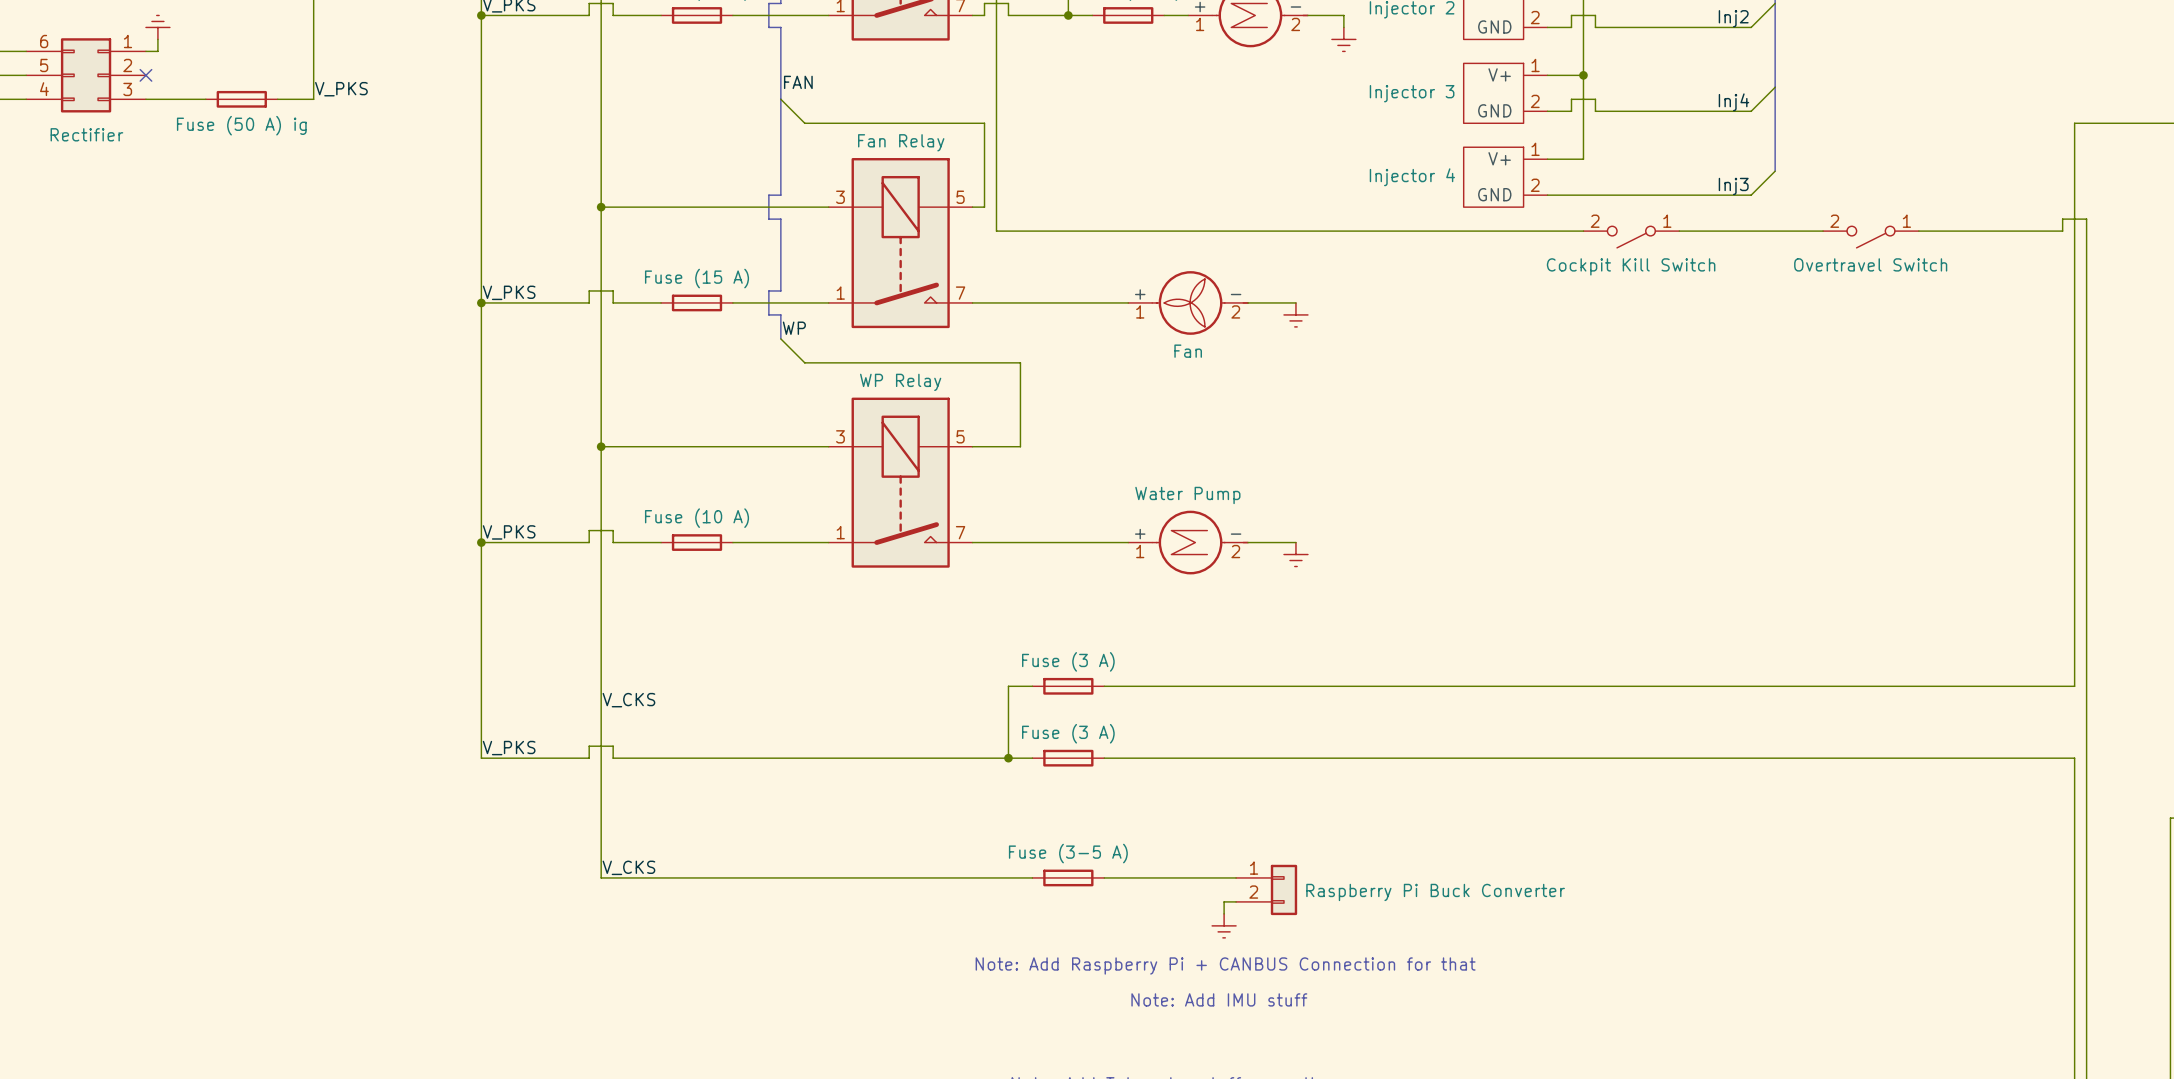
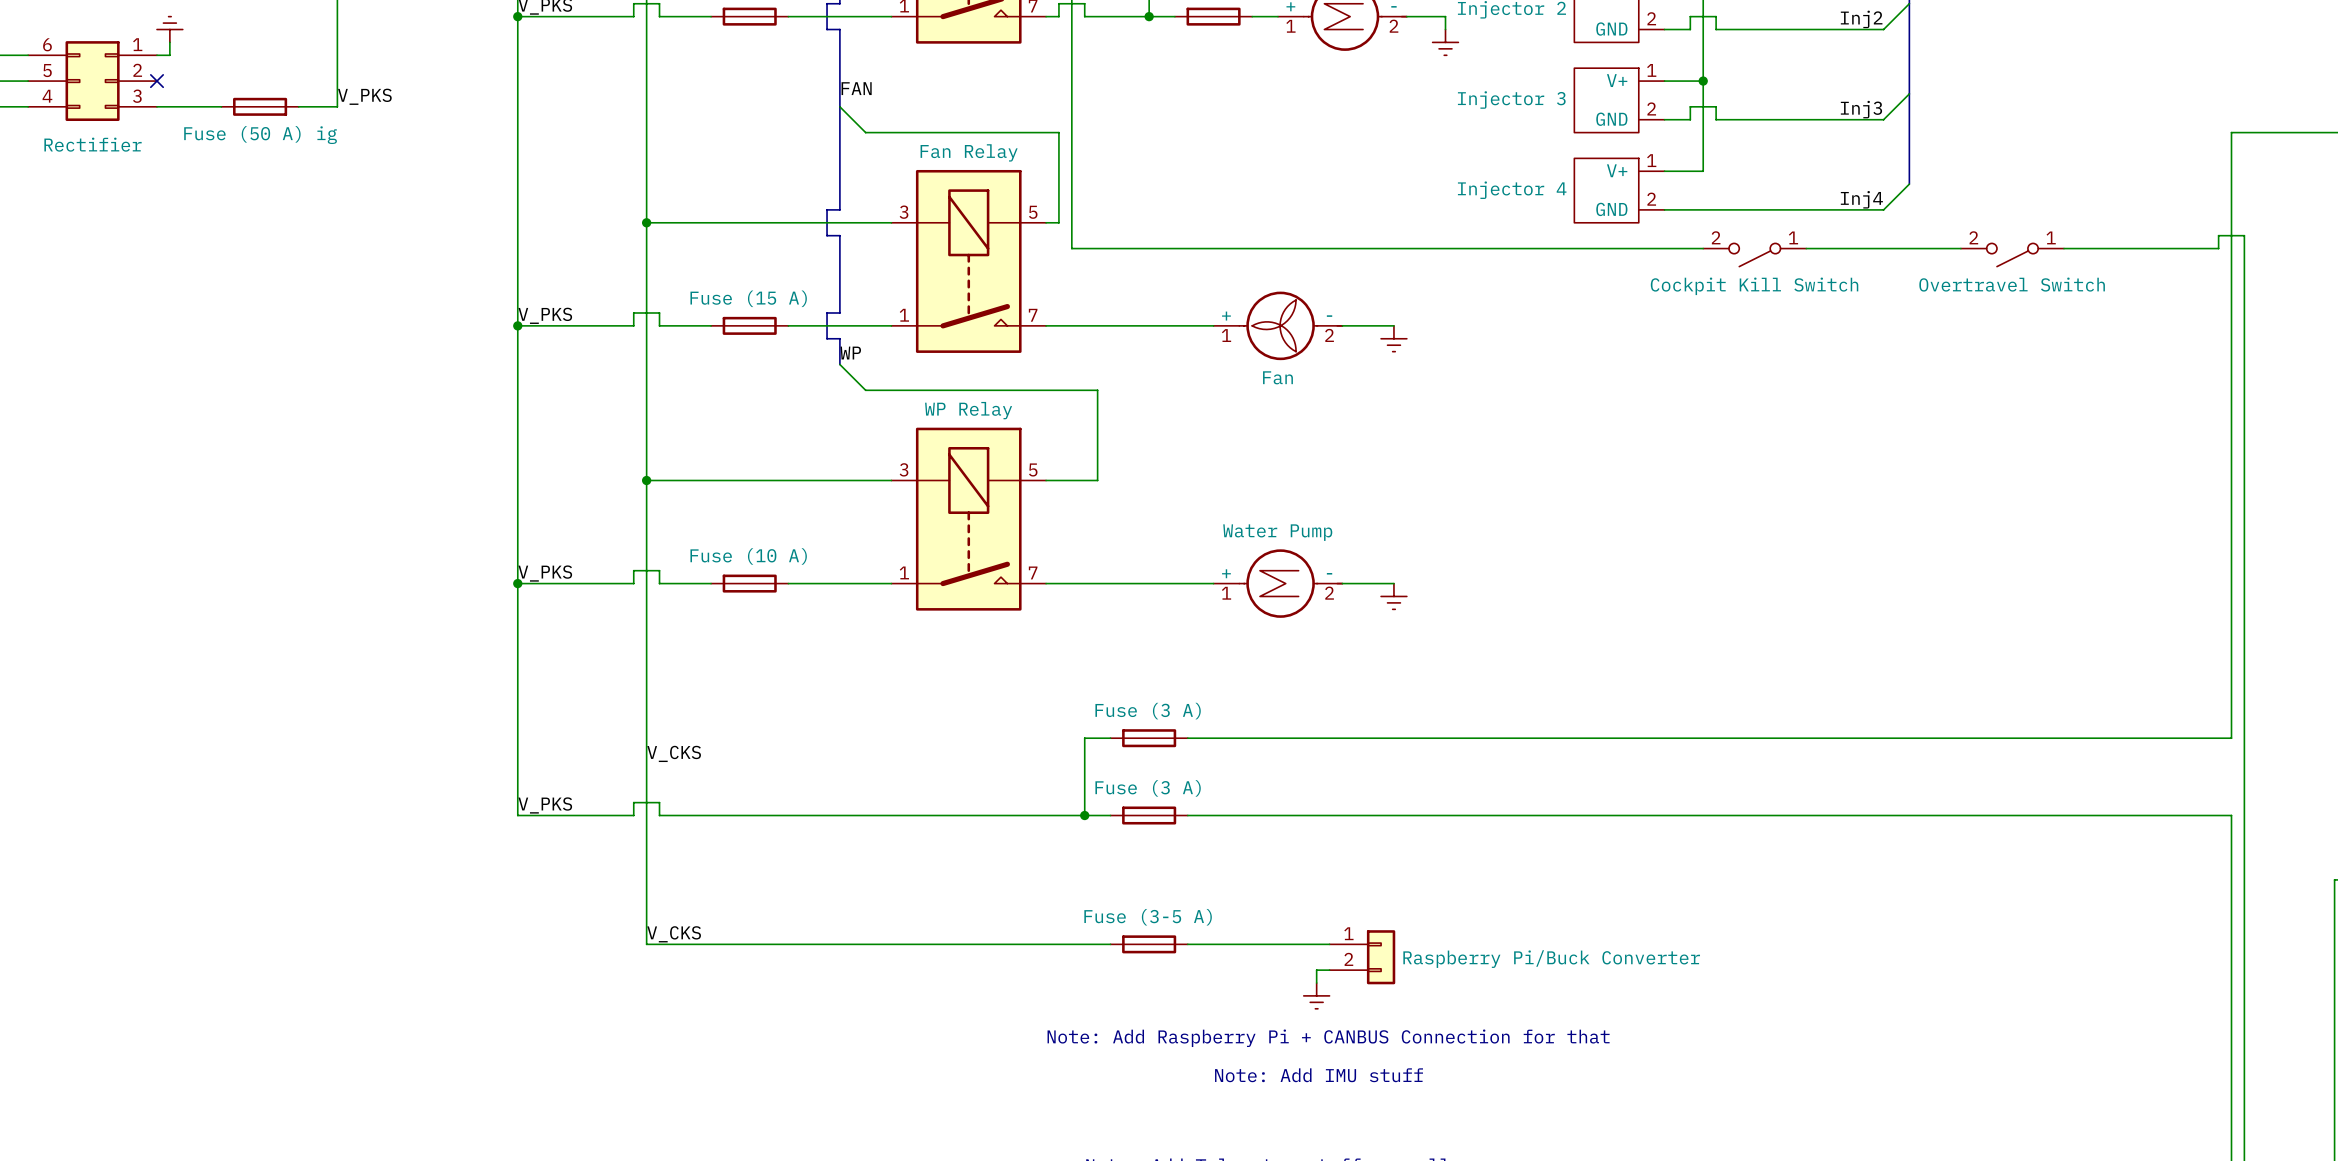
label: Inj4 (1733, 102) -> Inj3 (1861, 109)
label: Inj3 (1733, 186) -> Inj4 (1861, 199)
part value: Raspberry Pi Buck Converter (1435, 892) -> Raspberry Pi/Buck Converter (1551, 959)

